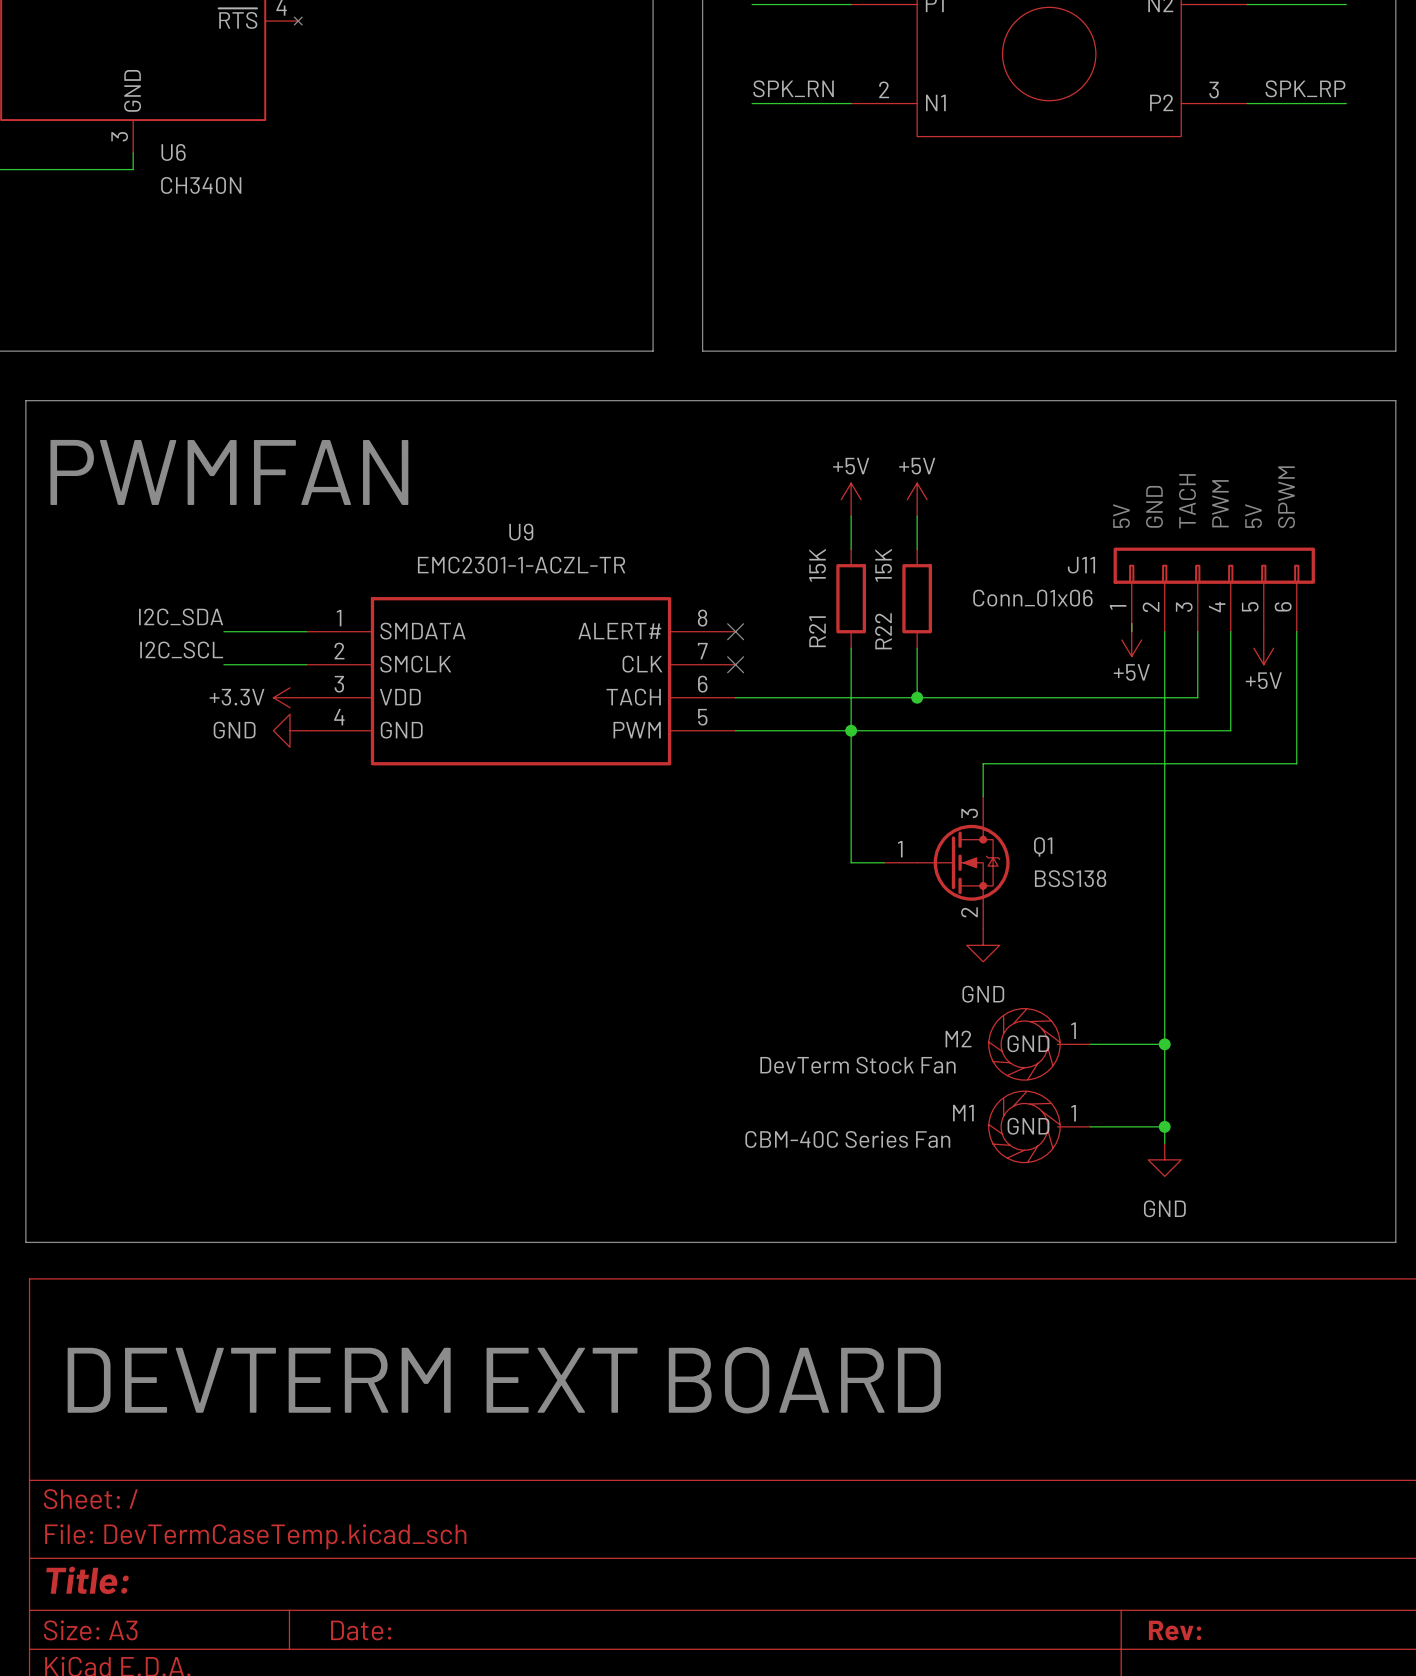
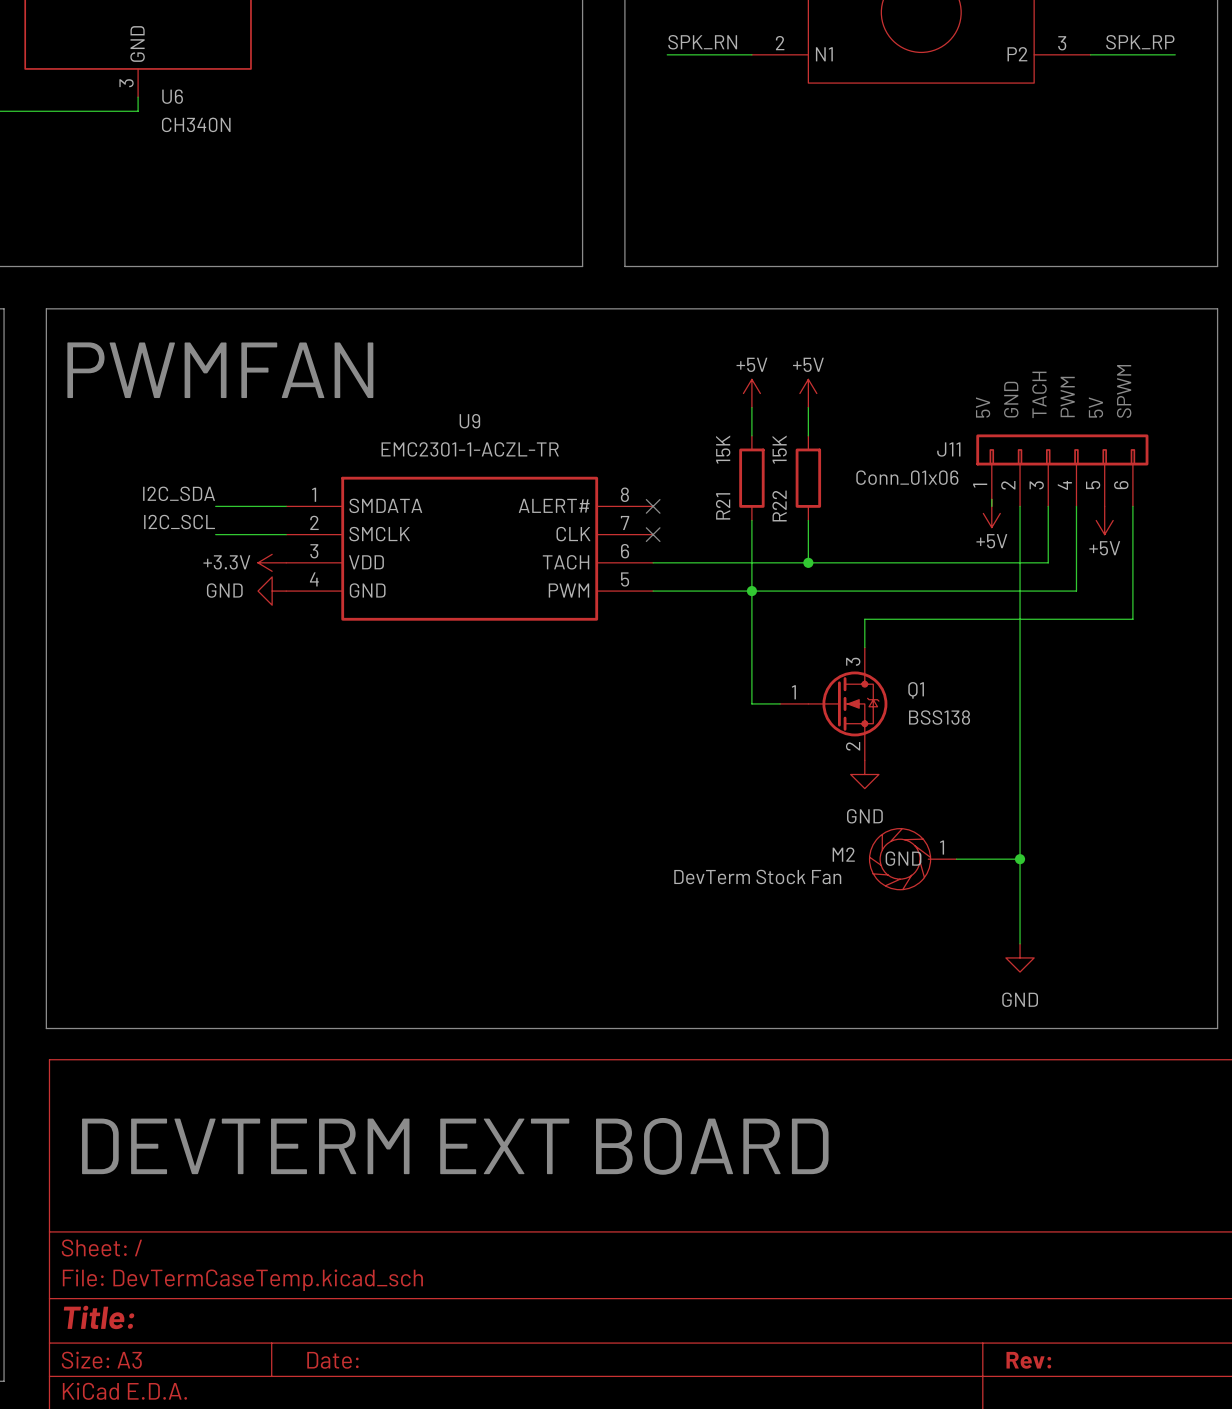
M1: CBM-40C Series Fan (1039, 1126) -> none
wire: (1090, 1126) (1164, 1126) -> none
junction: (1164, 1126) -> none

